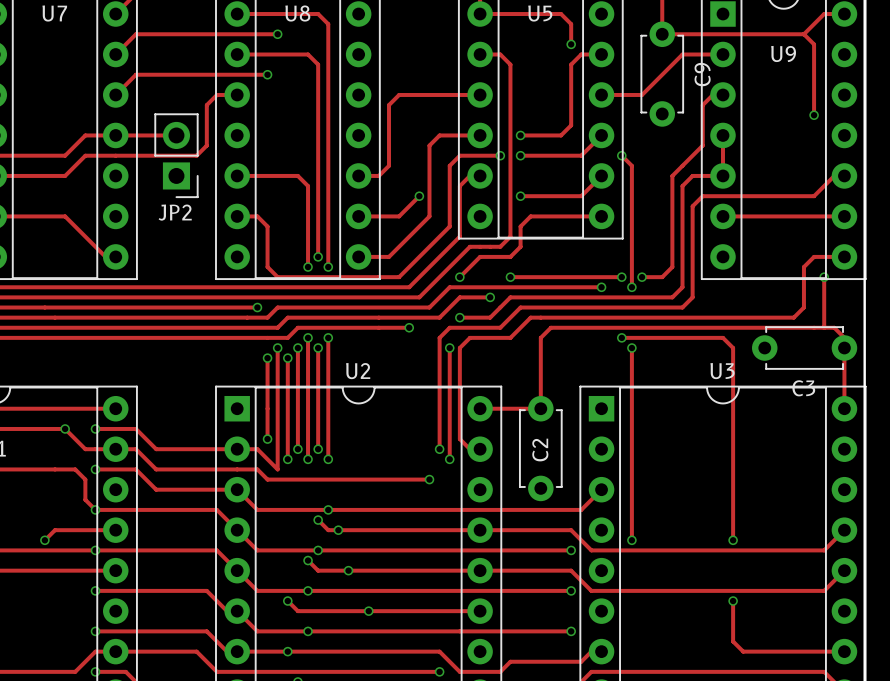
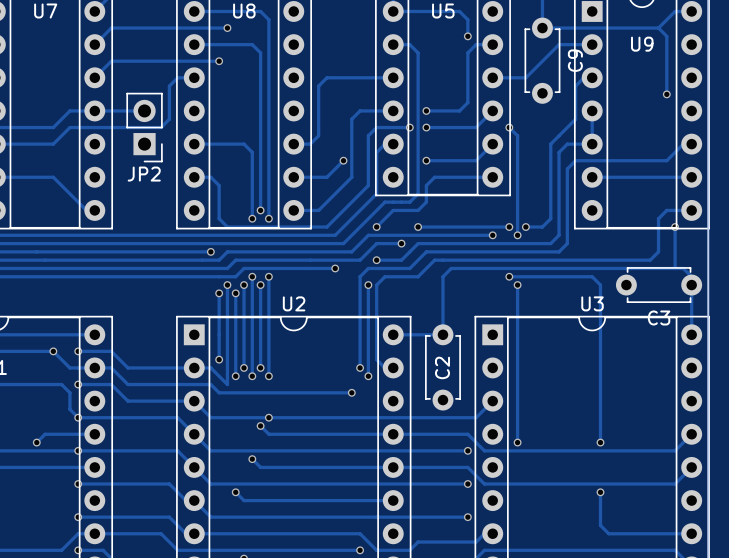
via: (338, 530) -> none
via: (318, 550) -> none
via: (348, 570) -> none
via: (308, 590) -> none
via: (368, 611) -> none
via: (308, 631) -> none
via: (287, 651) -> none

